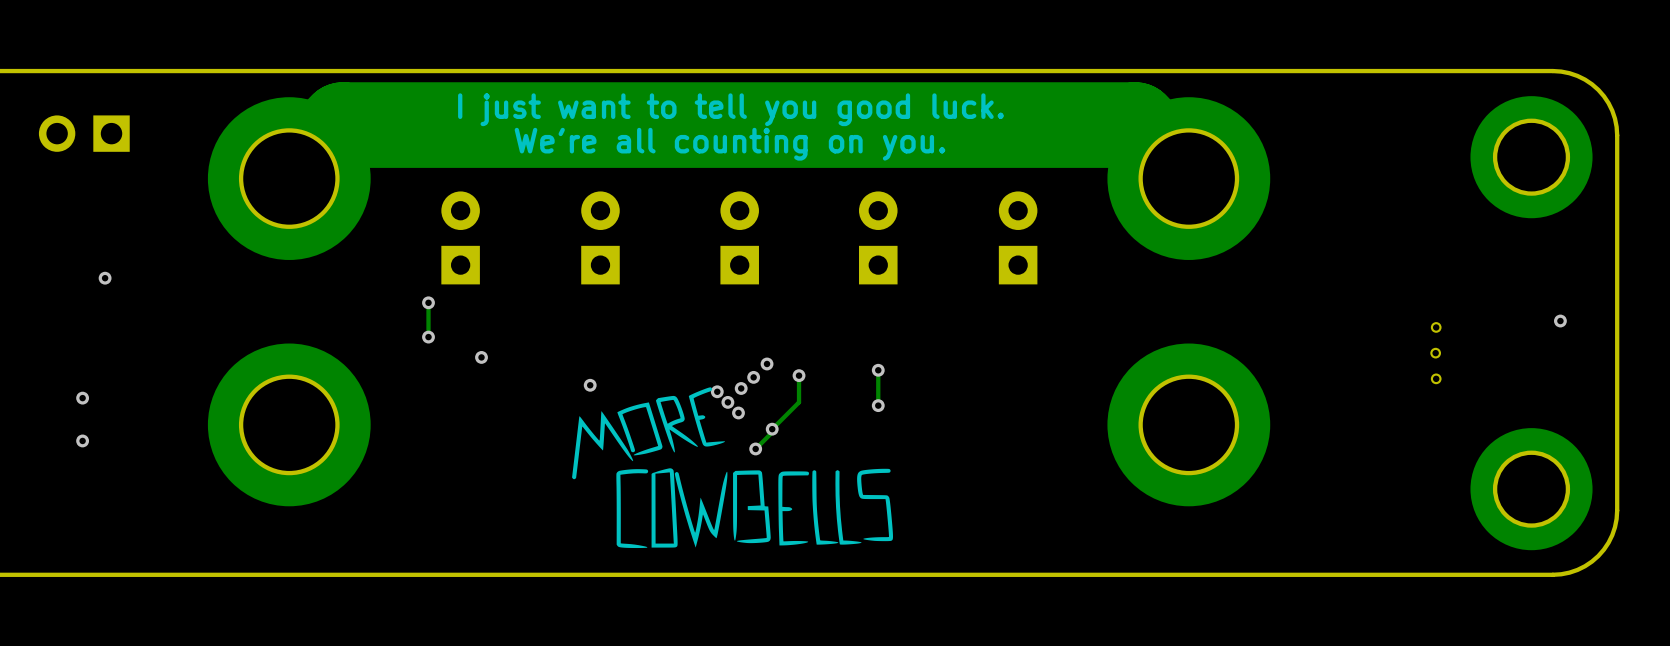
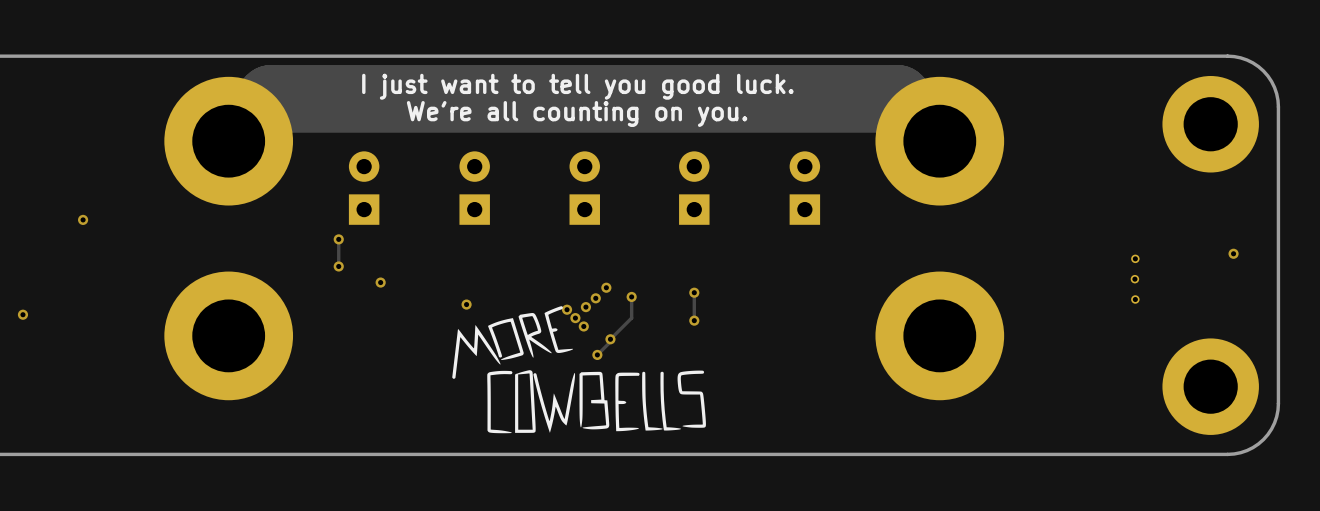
part: (84, 133) -> none
via: none -> (22, 314)
via: (82, 398) -> none
via: (82, 440) -> none

